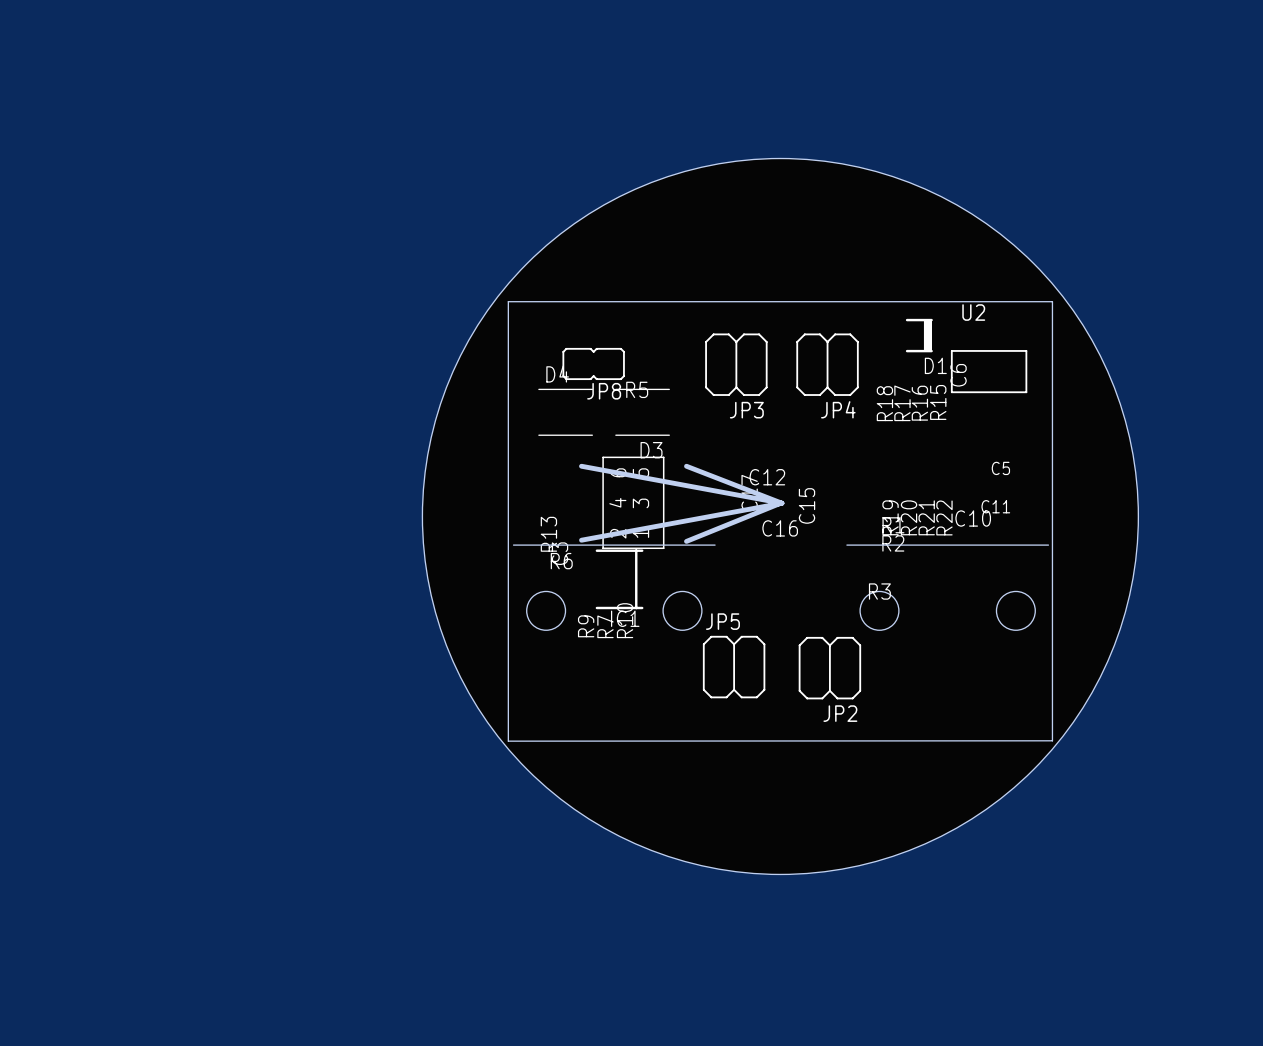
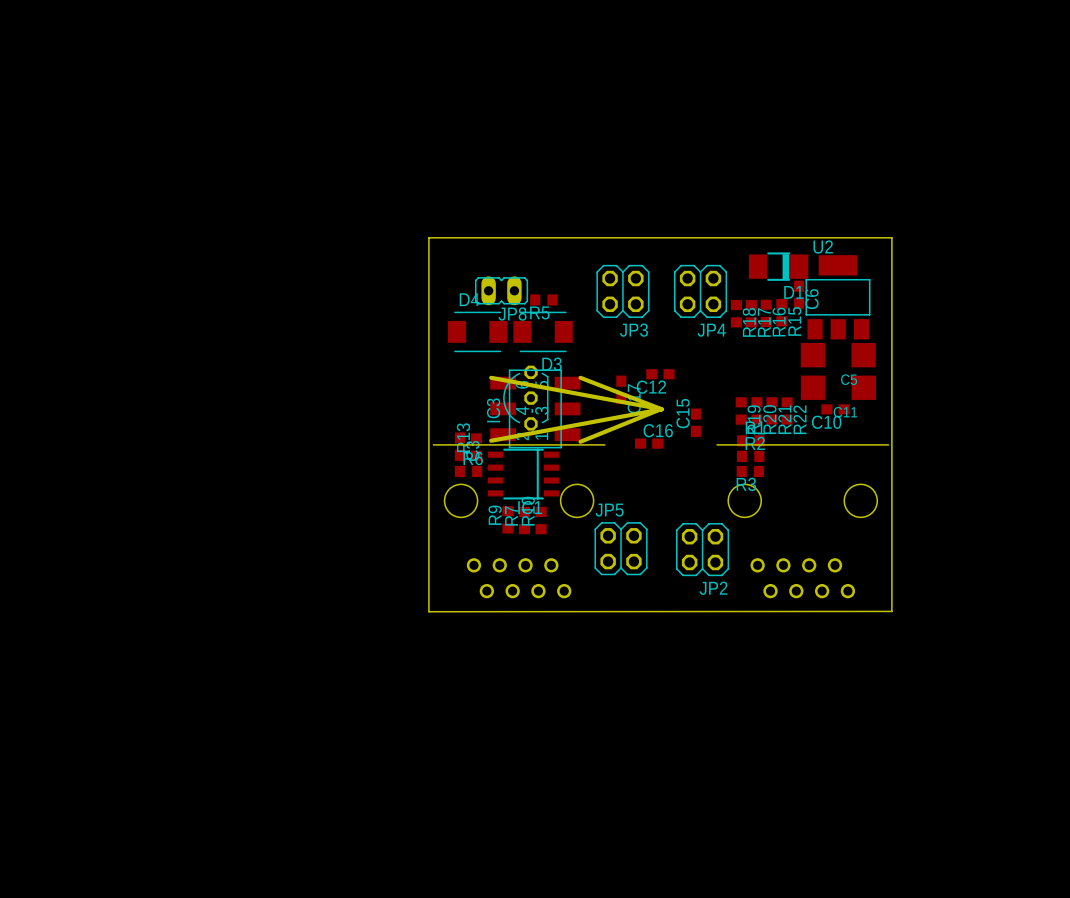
IC3: none -> (525, 398)
hole: (780, 516) -> none

